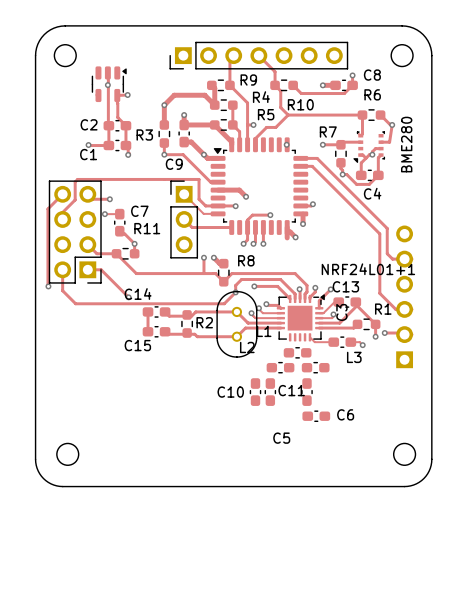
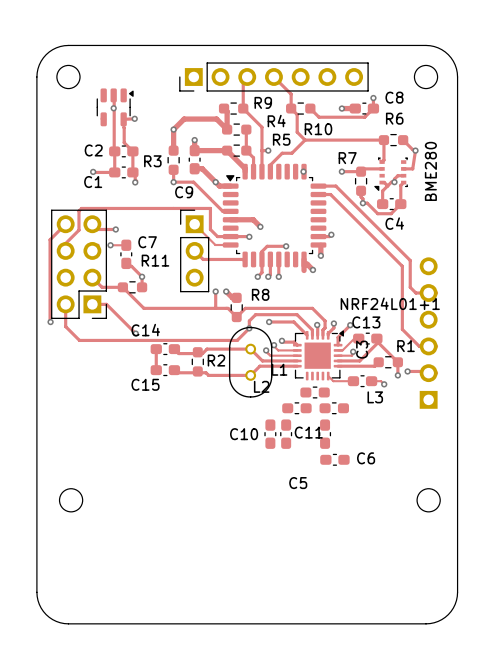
board edge: (35, 459) (37, 468) (43, 478) (50, 483) (62, 486) (407, 486) (416, 483) (423, 478) (430, 468) (431, 459) -> (36, 505) (37, 600) (41, 608) (49, 617) (60, 622) (68, 623) (434, 622) (448, 614) (456, 600) (457, 505)

